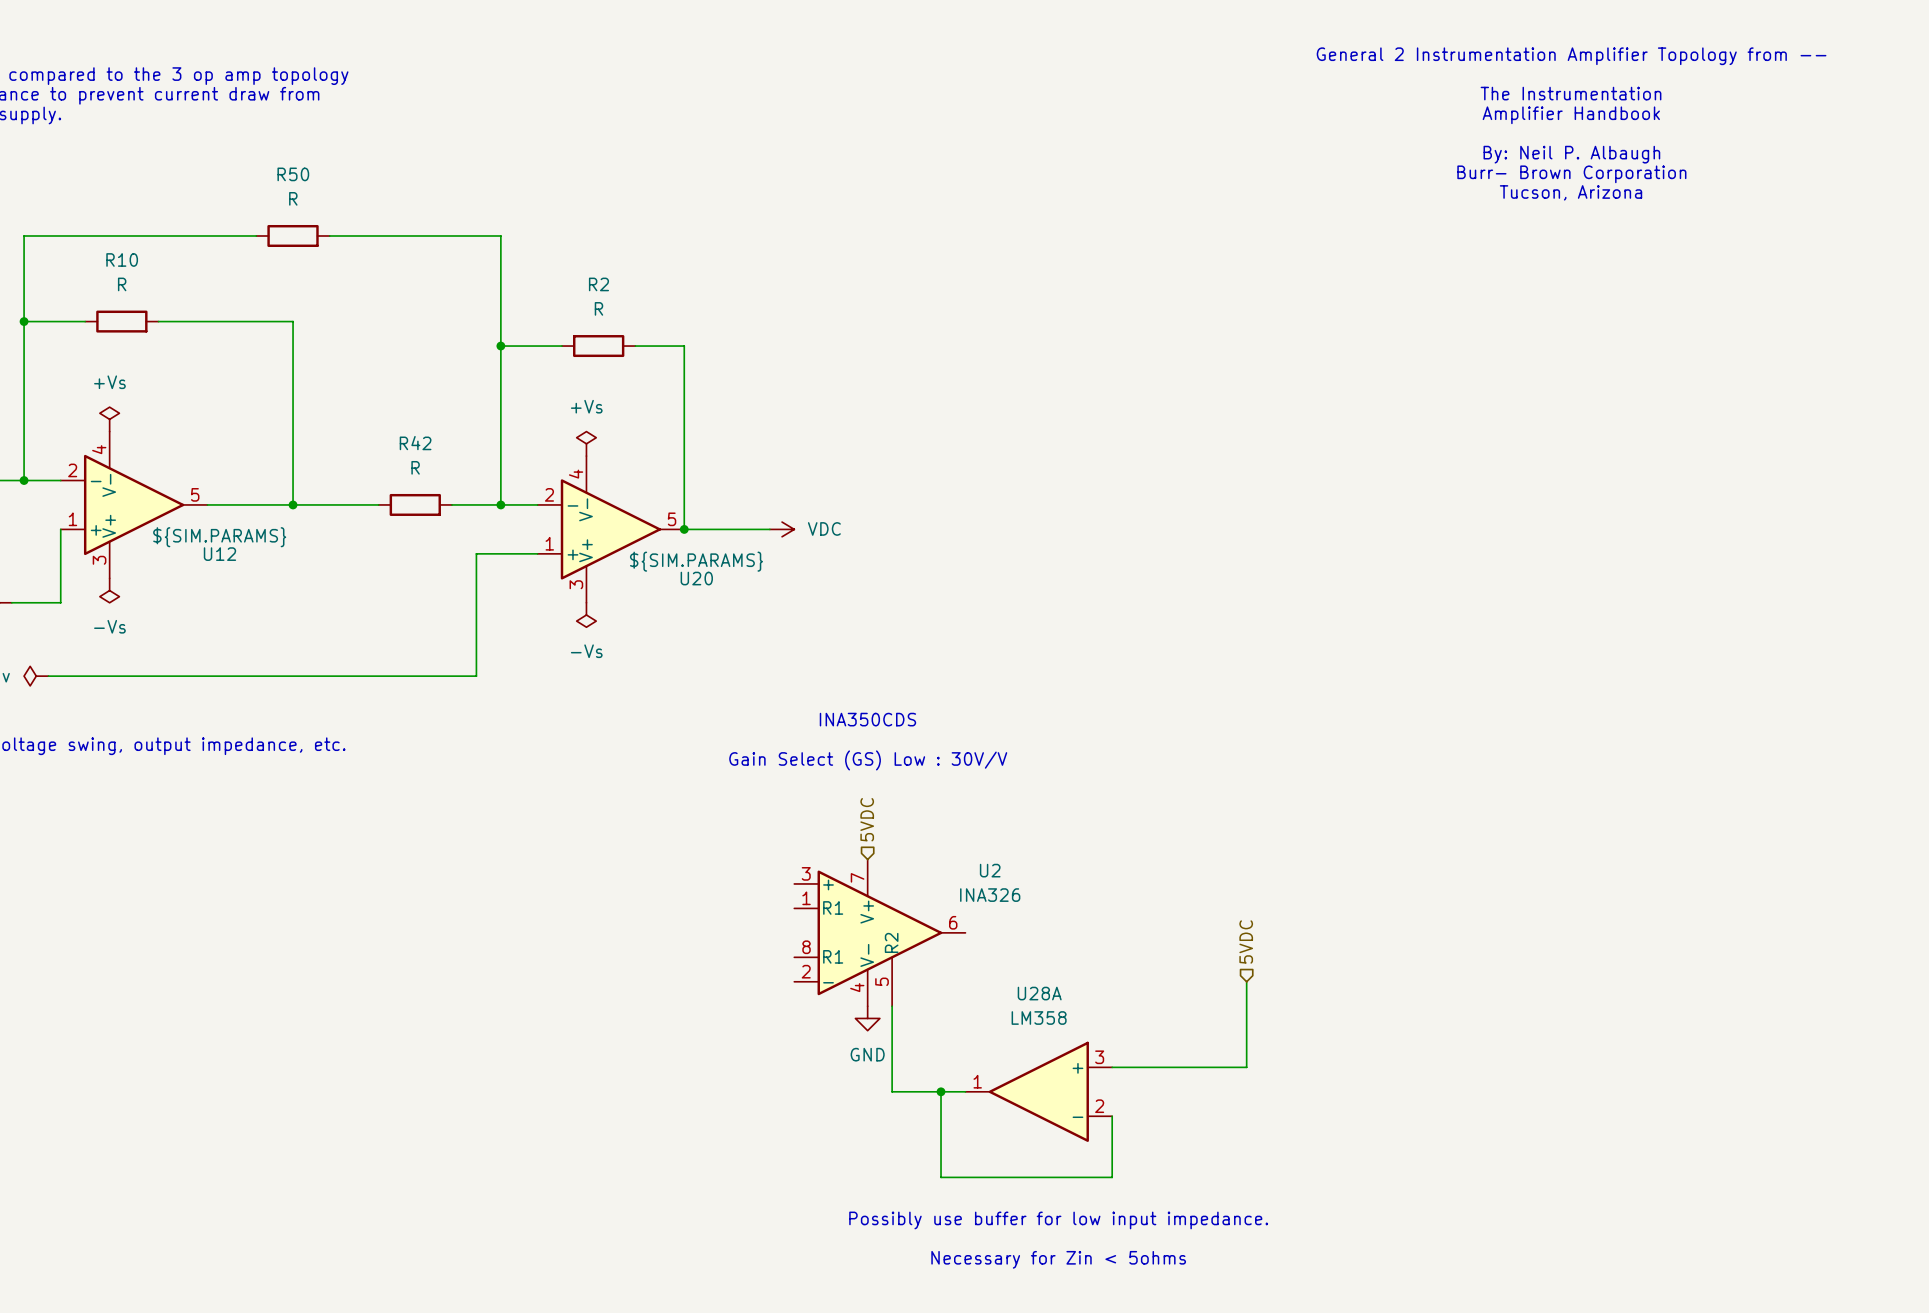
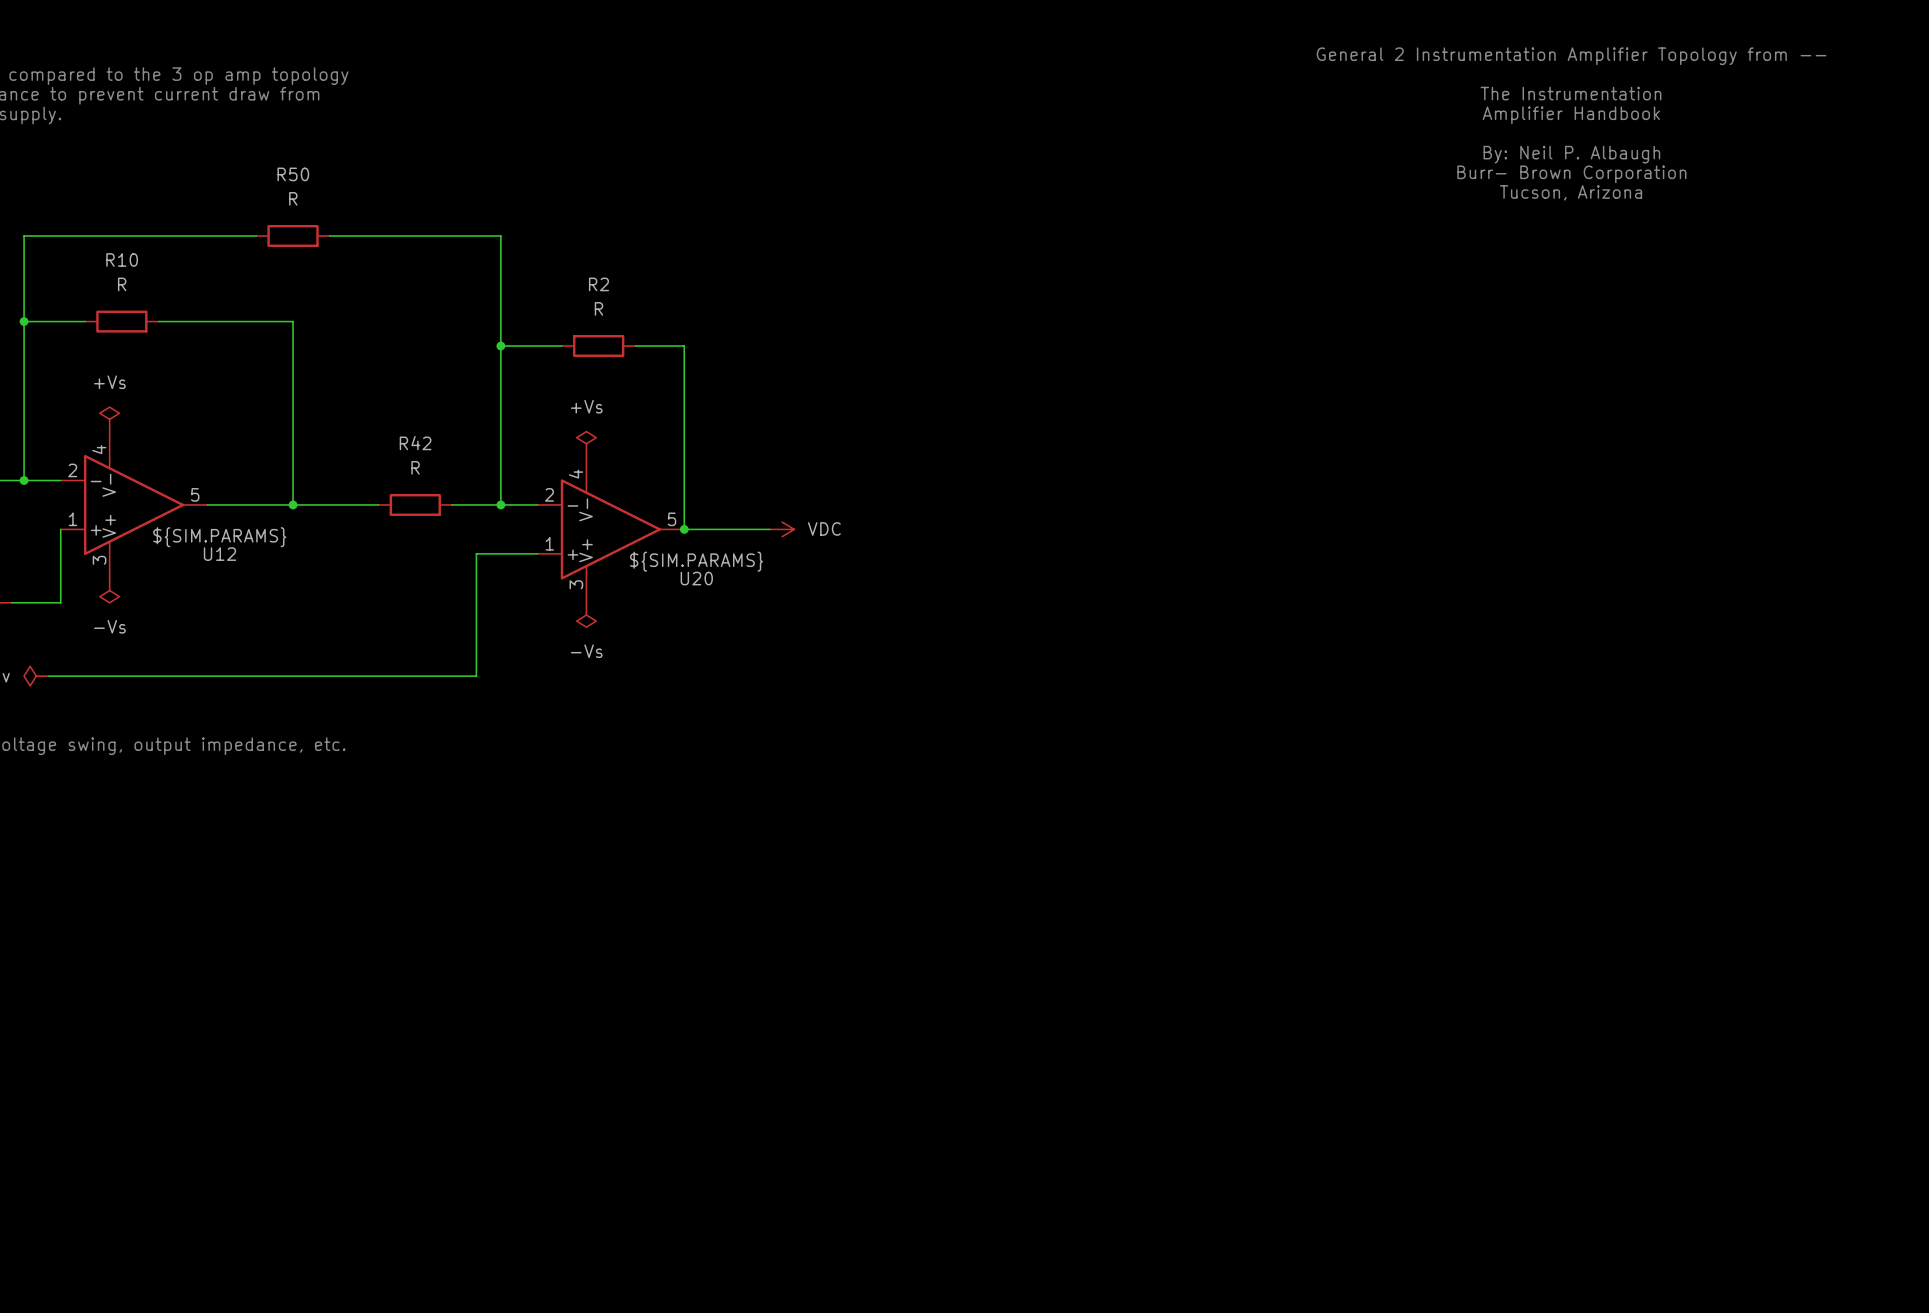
text: INA350CDS (867, 719) -> none
text: Gain Select (GS) Low : 30V/V (868, 760) -> none
hierarchical label: 5VDC (867, 819) -> none
U2: INA326 (879, 932) -> none
hierarchical label: 5VDC (1246, 942) -> none
wire: (1246, 981) (1246, 1067) (1112, 1067) -> none
wire: (892, 1006) (892, 1091) (965, 1091) -> none
power symbol: GND (867, 1018) -> none
wire: (941, 1091) (941, 1177) (1112, 1177) (1112, 1116) -> none
junction: (941, 1091) -> none
U28A: LM358 (1038, 1091) -> none
text: Possibly use buffer for low input impedance. (1058, 1220) -> none
text: Necessary for Zin < 5ohms (1058, 1259) -> none

